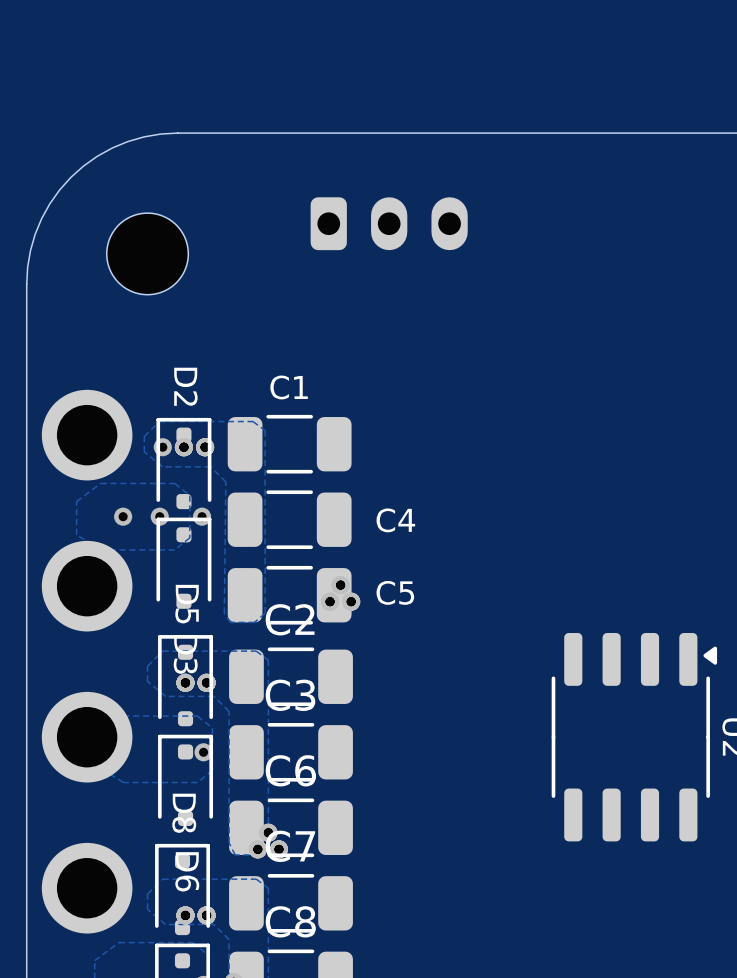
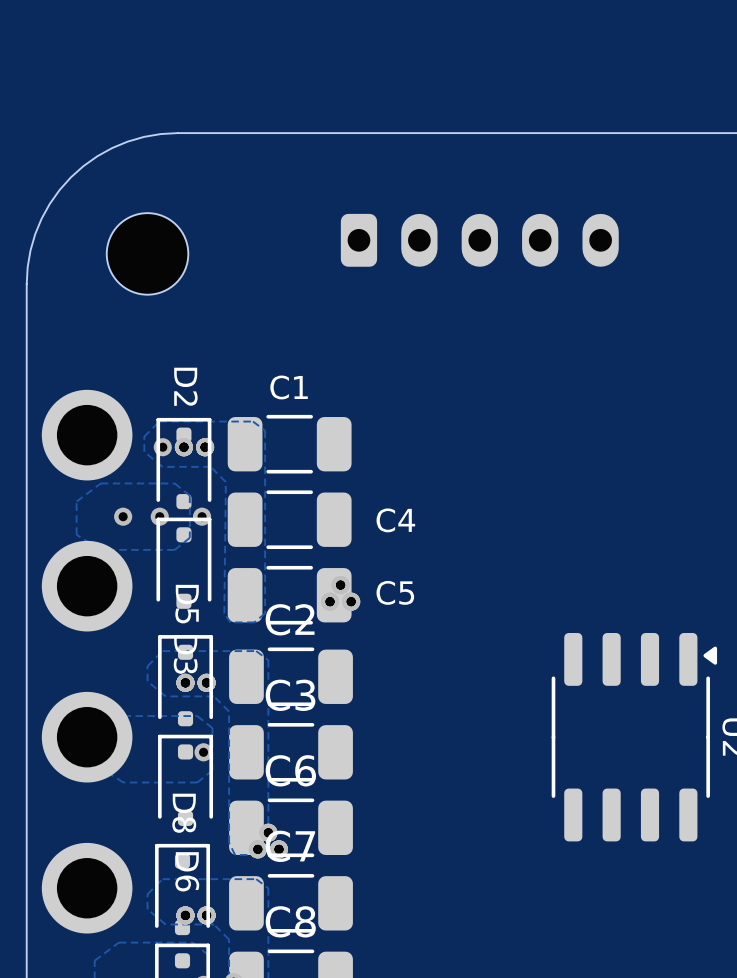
part: (389, 223) -> none
part: none -> (479, 240)

